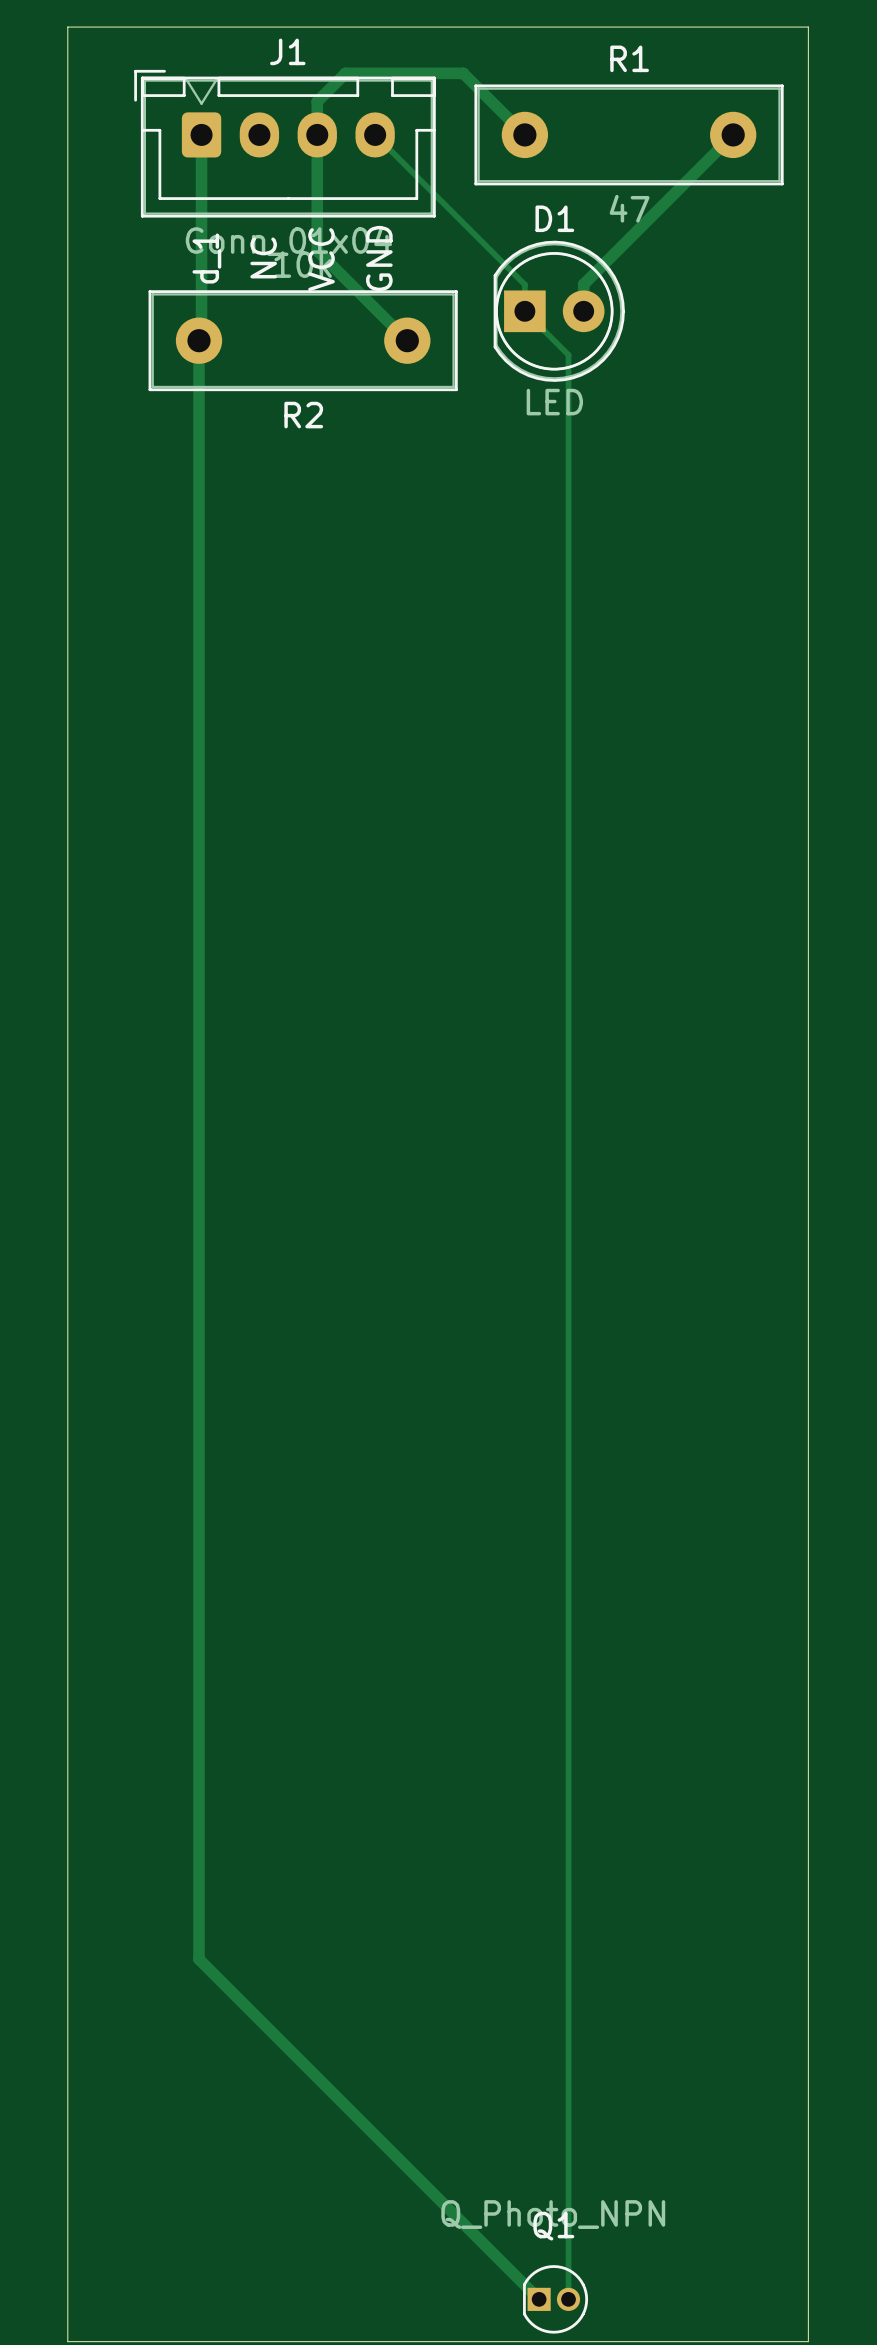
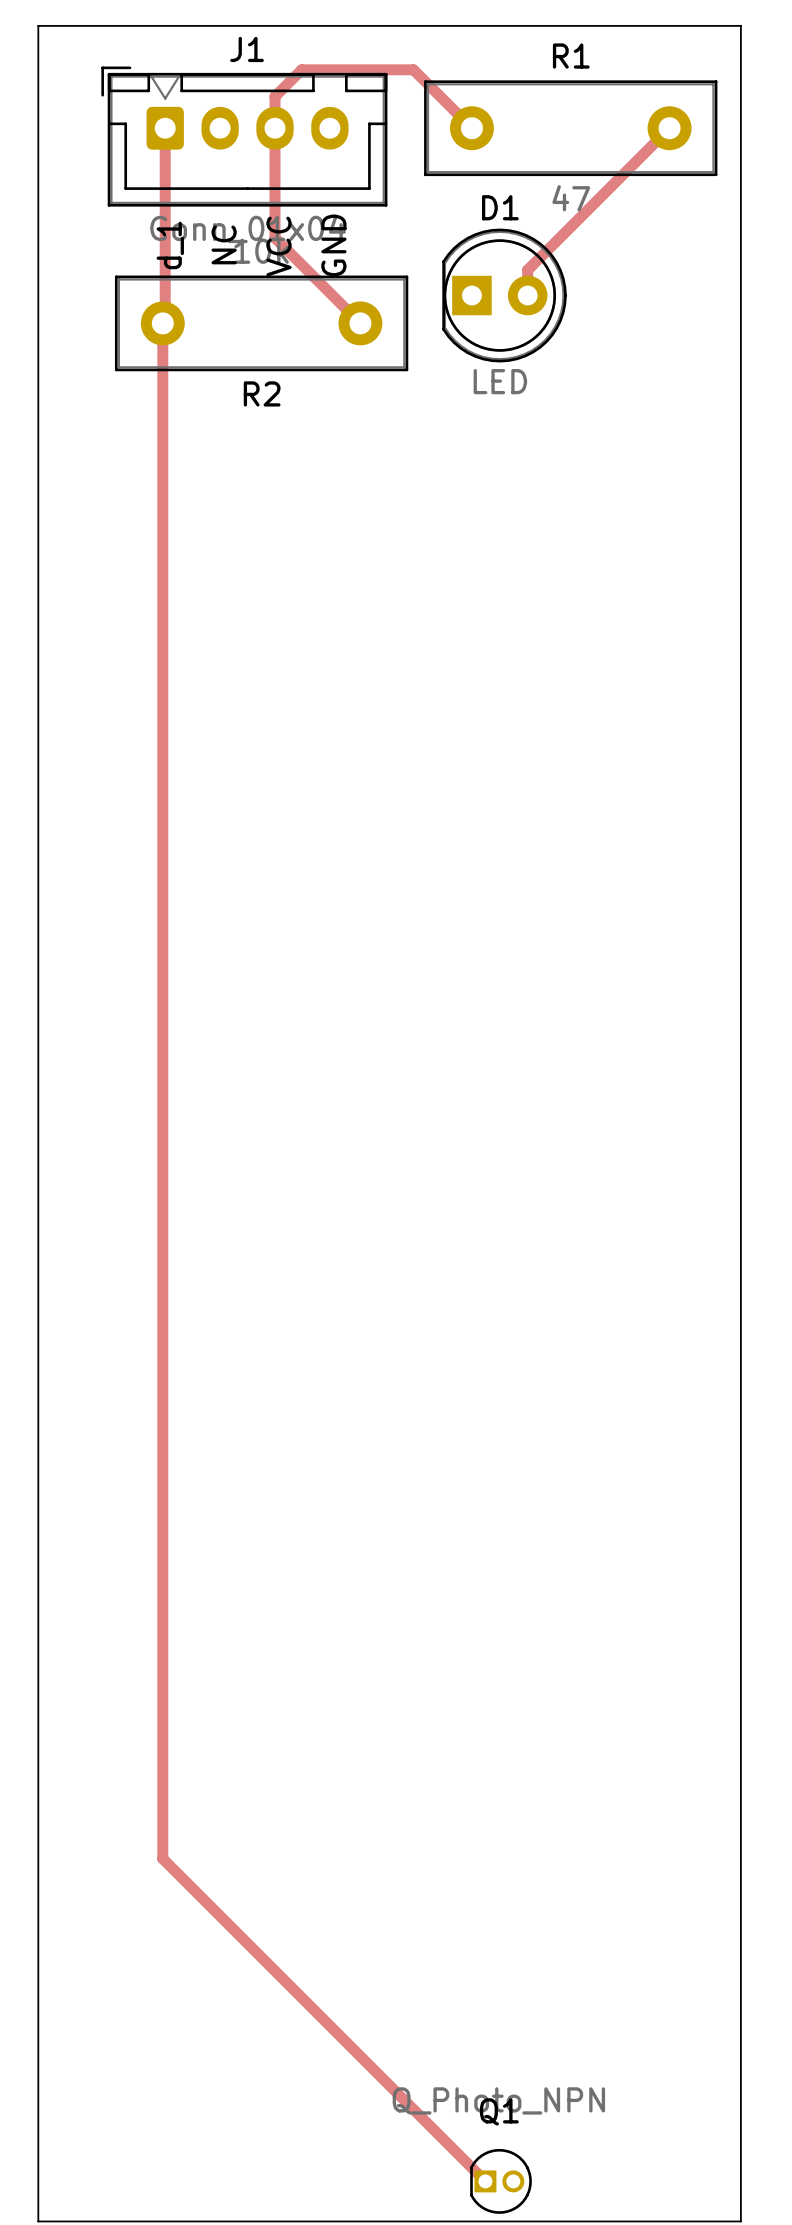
track: (375, 134) (524, 284) (524, 311) (568, 354) (568, 2299) -> none

